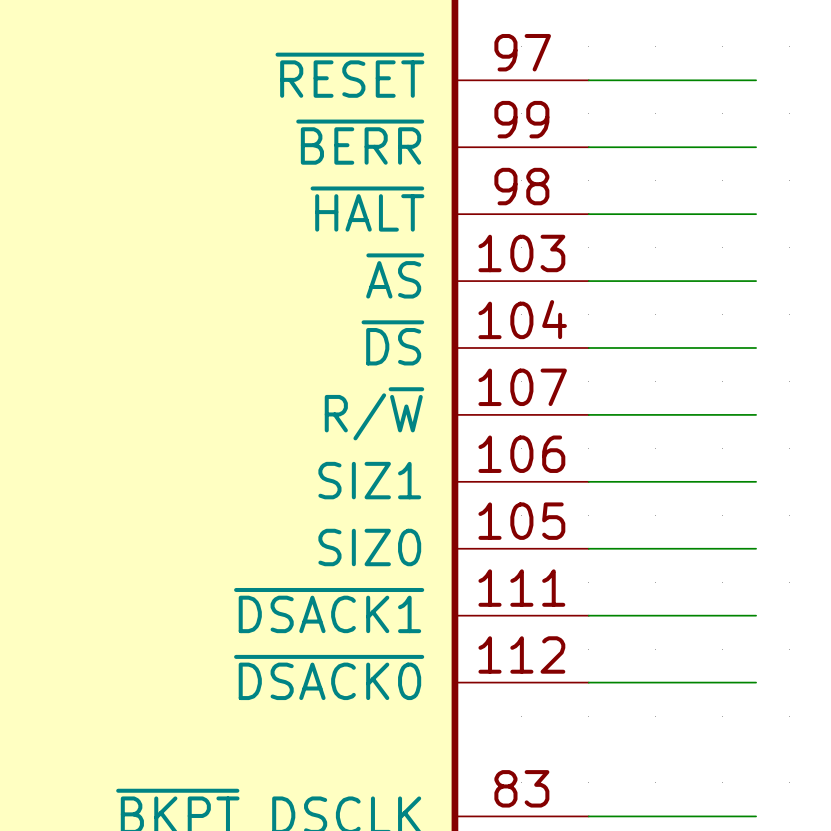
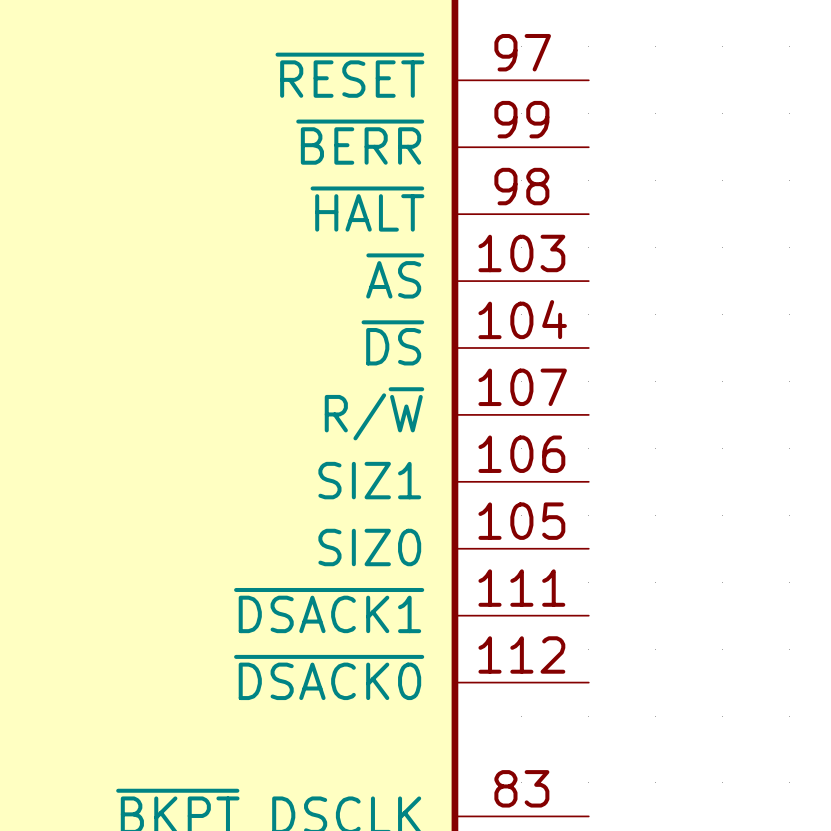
wire: (588, 80) (756, 80) -> none
wire: (588, 147) (756, 147) -> none
wire: (588, 214) (756, 214) -> none
wire: (588, 281) (756, 281) -> none
wire: (588, 347) (756, 347) -> none
wire: (588, 414) (756, 414) -> none
wire: (588, 481) (756, 481) -> none
wire: (588, 548) (756, 548) -> none
wire: (588, 615) (756, 615) -> none
wire: (588, 682) (756, 682) -> none
wire: (588, 816) (756, 816) -> none

